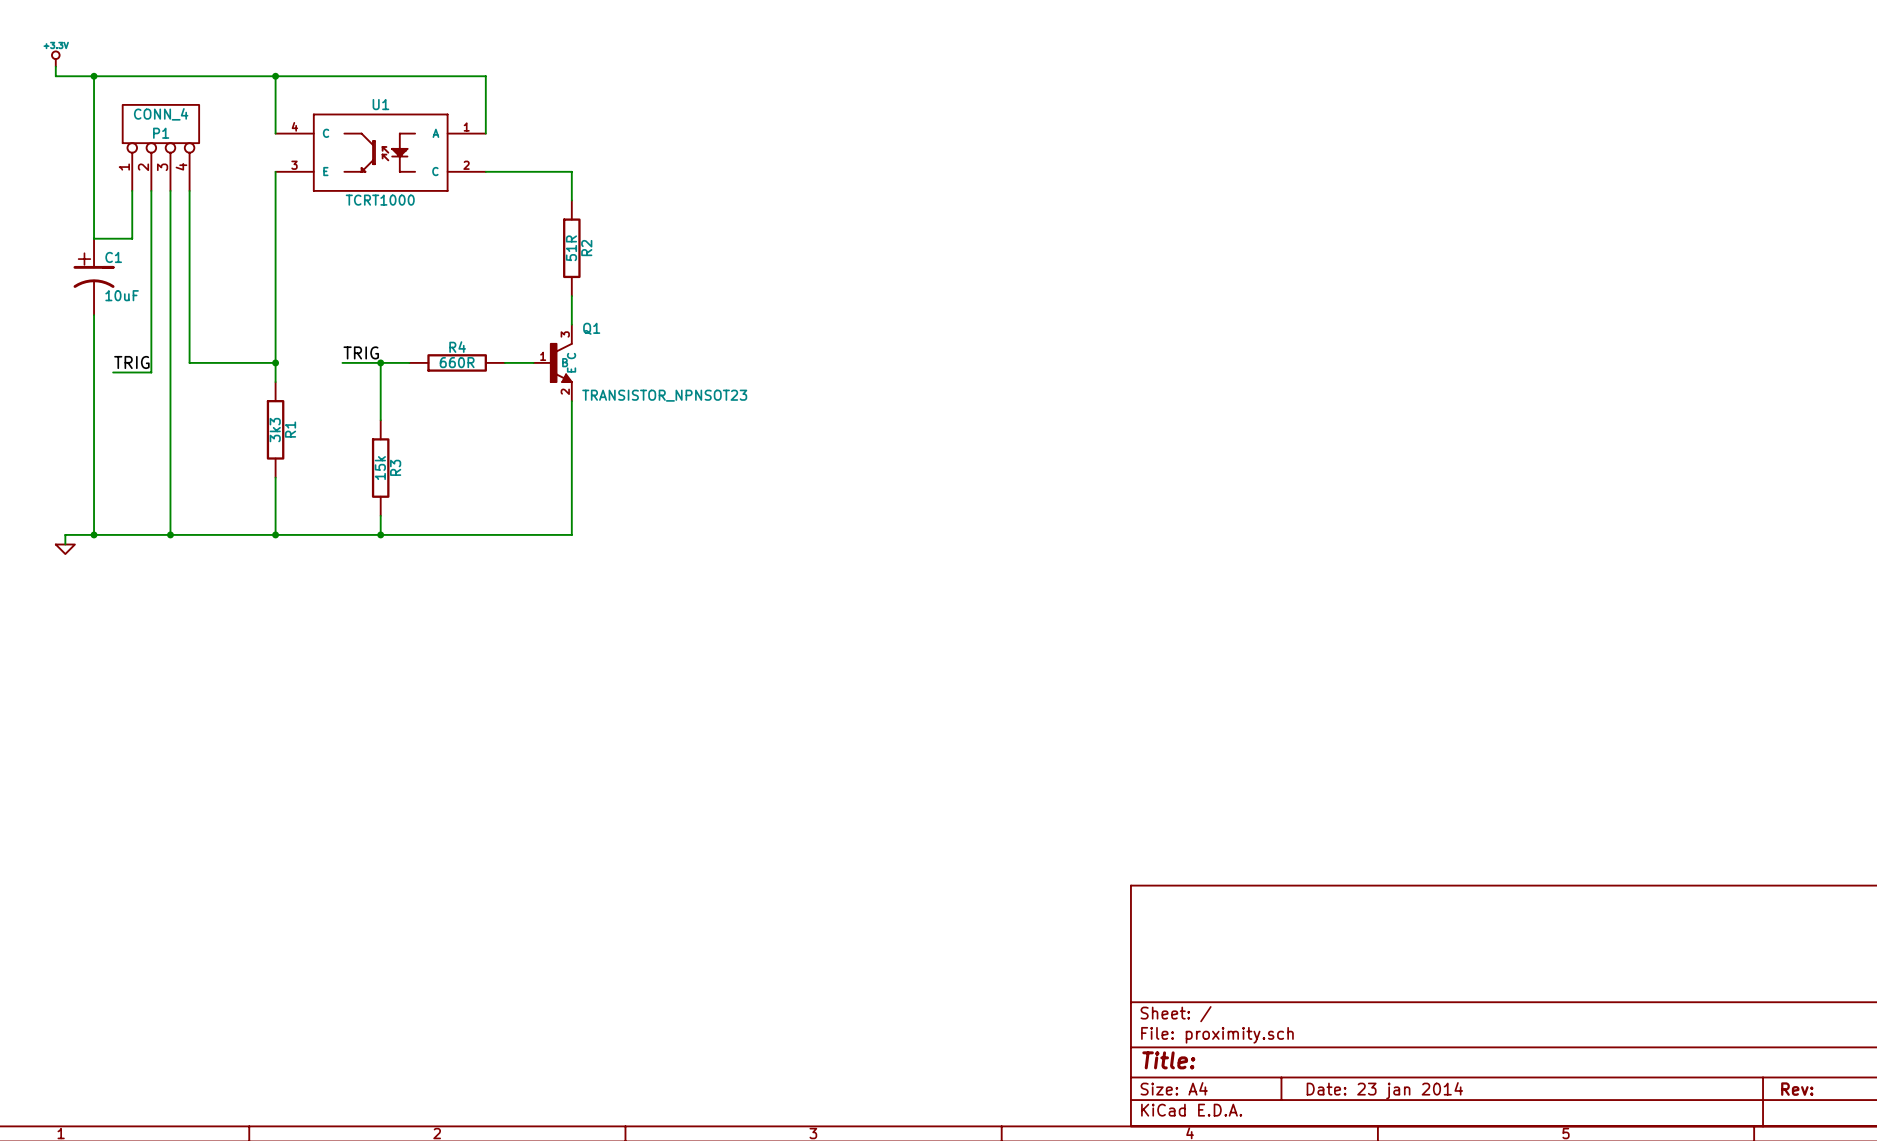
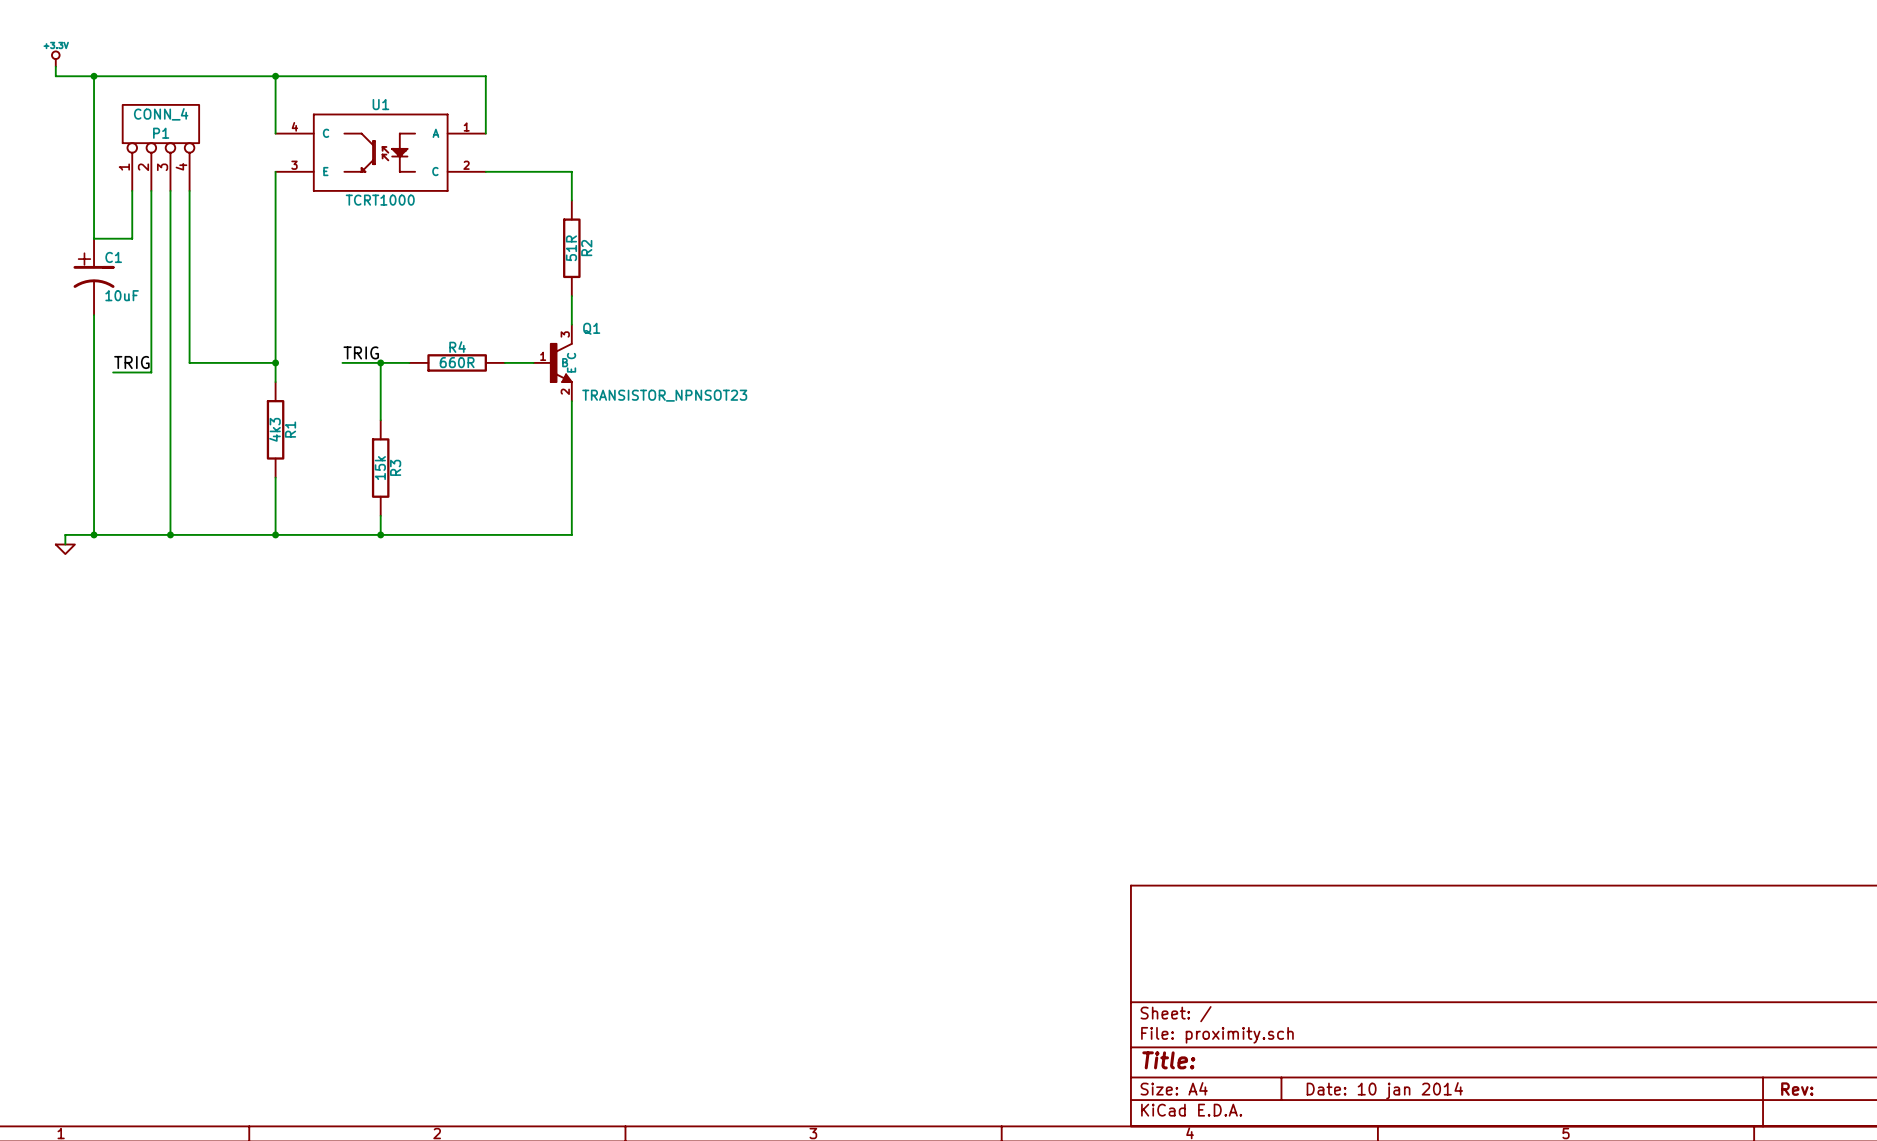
R1 value: 3k3 (275, 430) -> 4k3 (275, 429)
title block: Date: 23 jan 2014 (1384, 1090) -> Date: 10 jan 2014 (1384, 1090)

